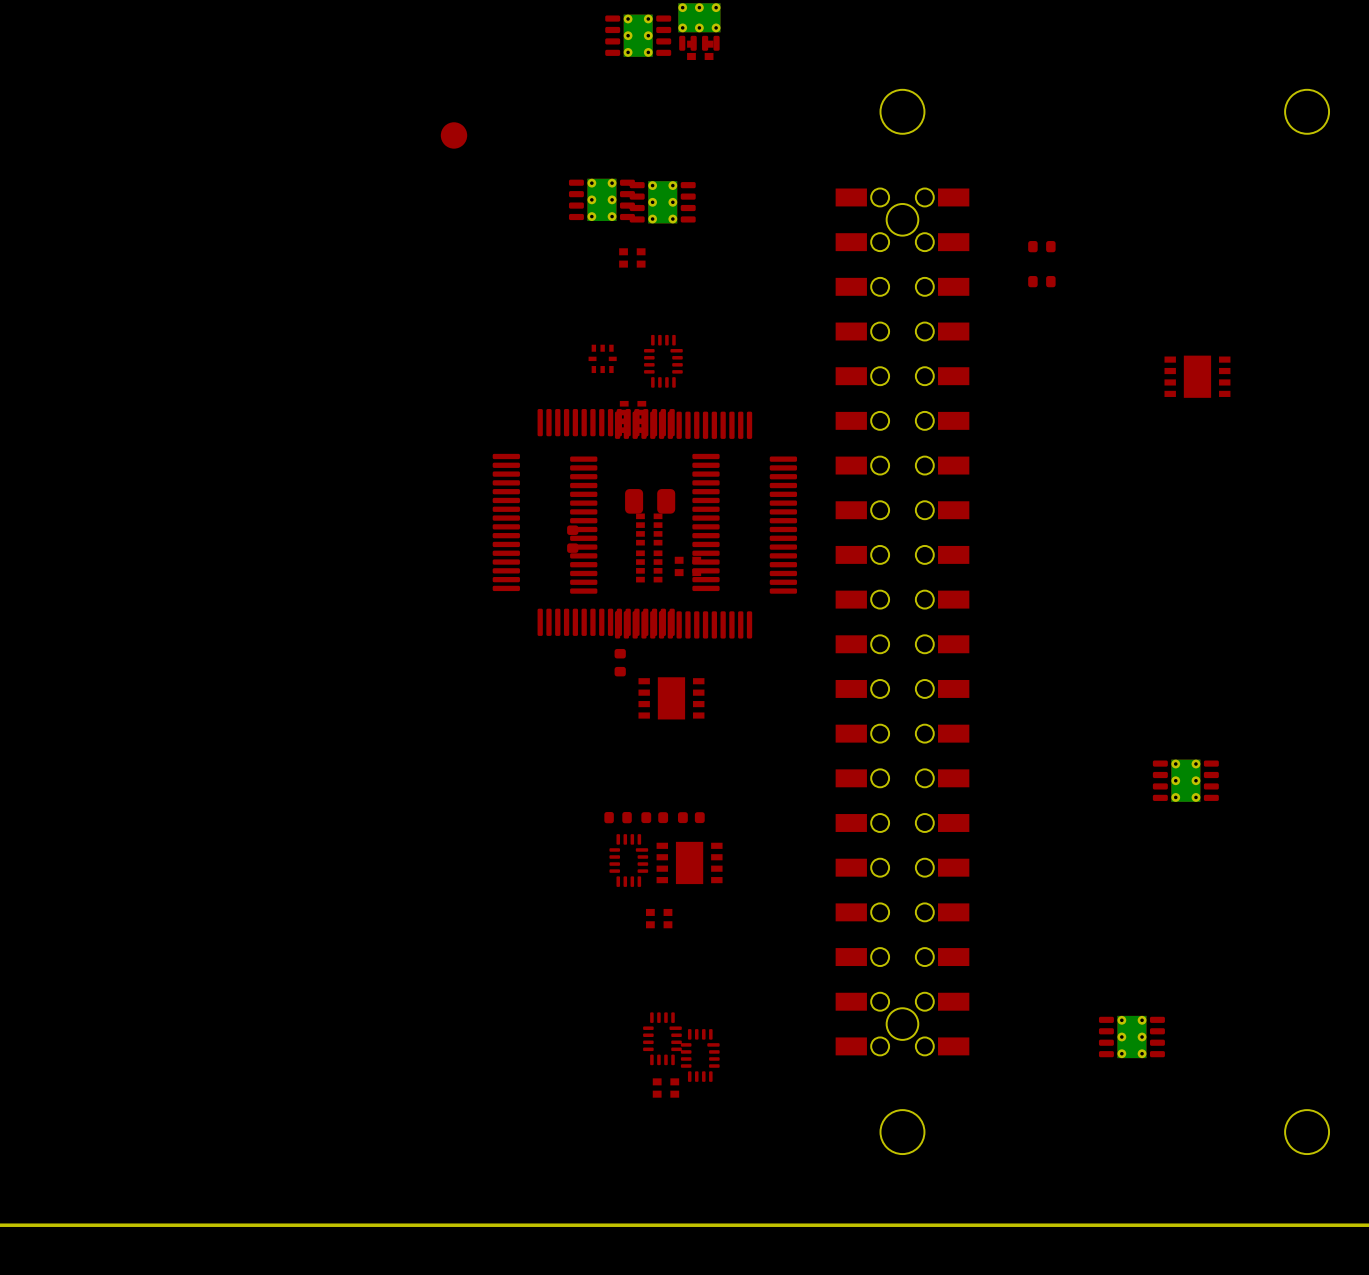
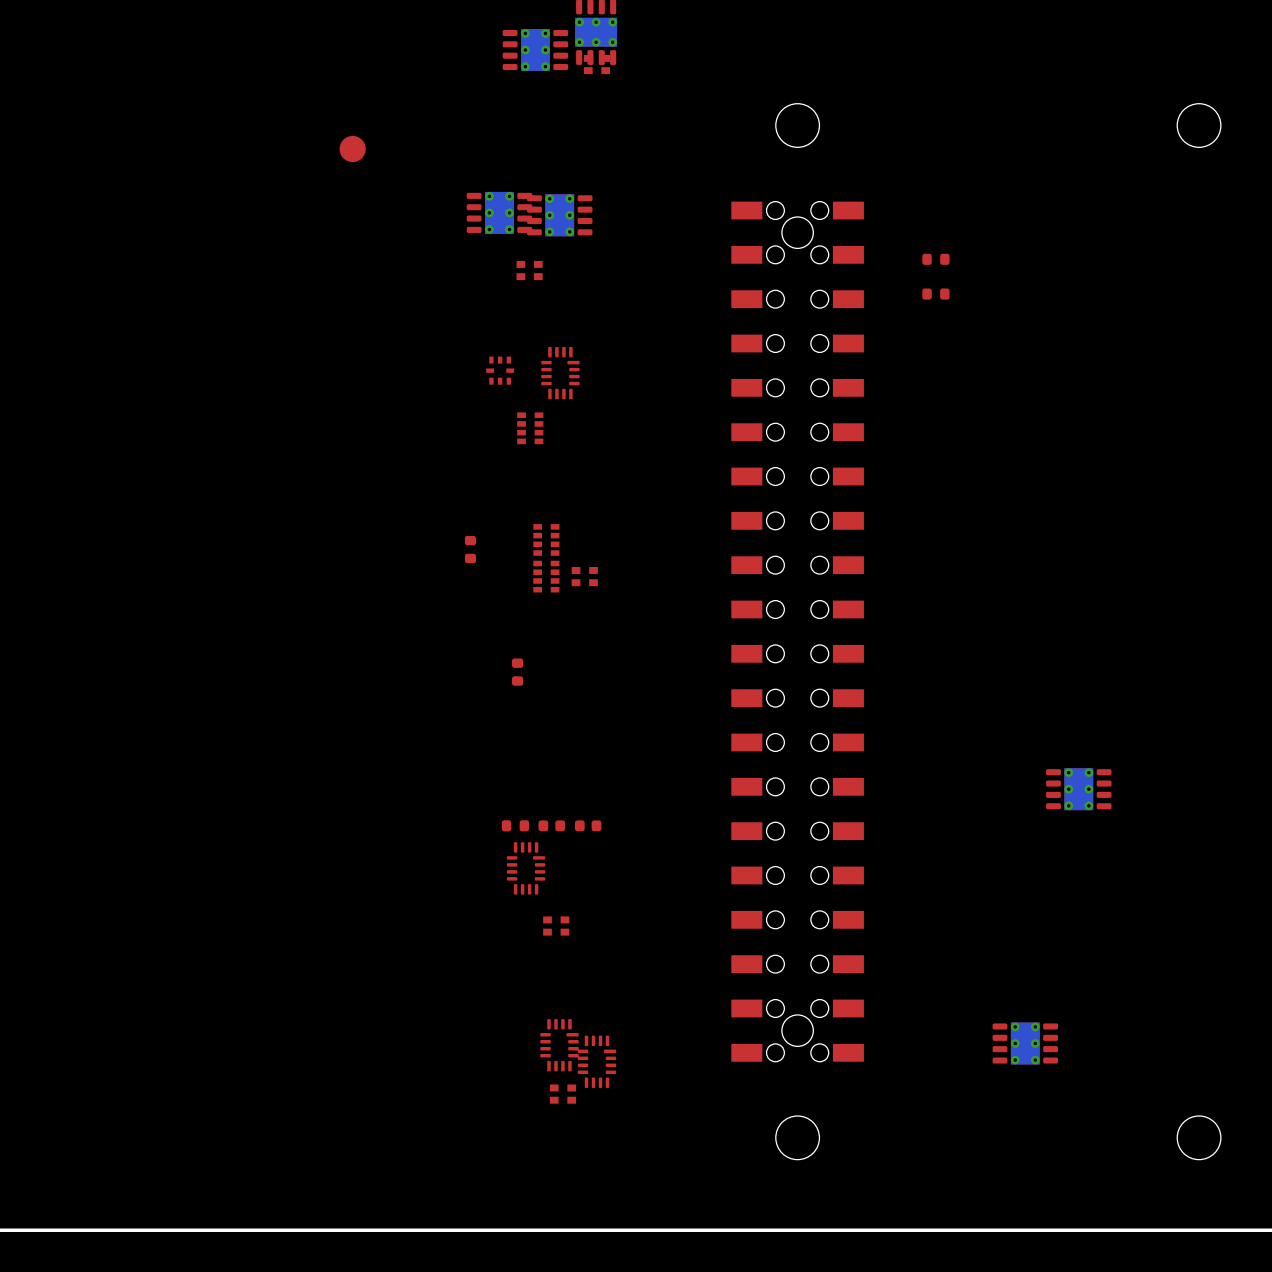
part: (1197, 376) -> none
part: (650, 501) -> none
part: (606, 522) -> none
part: (683, 525) -> none
part: (671, 698) -> none
part: (689, 862) -> none

